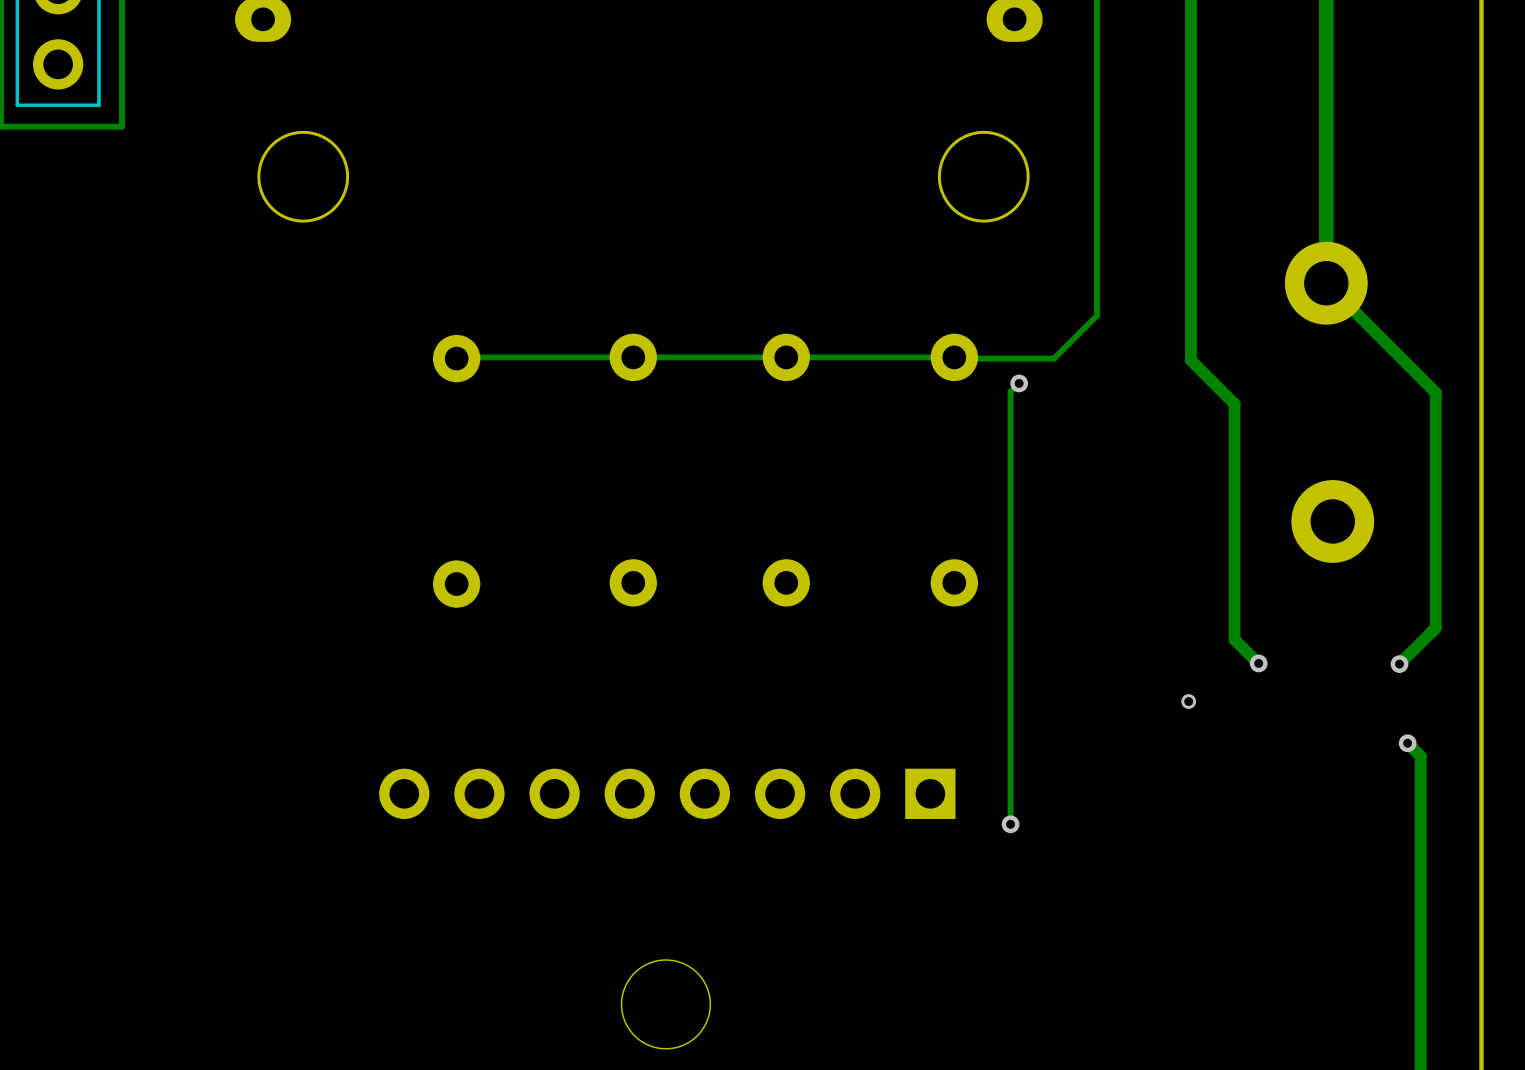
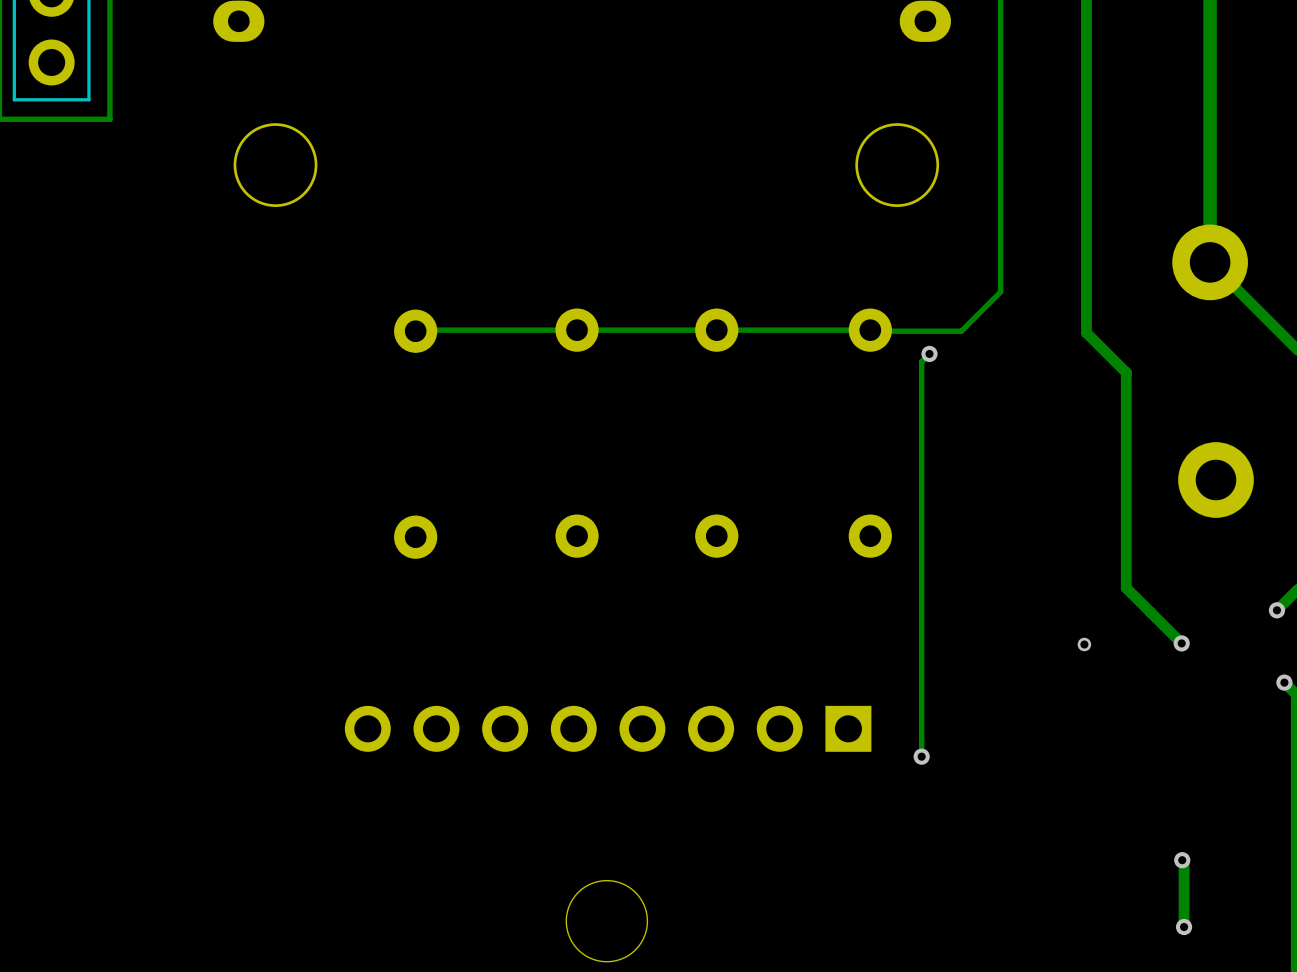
track: none -> (1147, 609) (1181, 643)
via position: (1258, 663) -> (1181, 643)
track: none -> (1182, 860) (1184, 862) (1184, 927)
via: none -> (1182, 860)
via: none -> (1184, 927)

